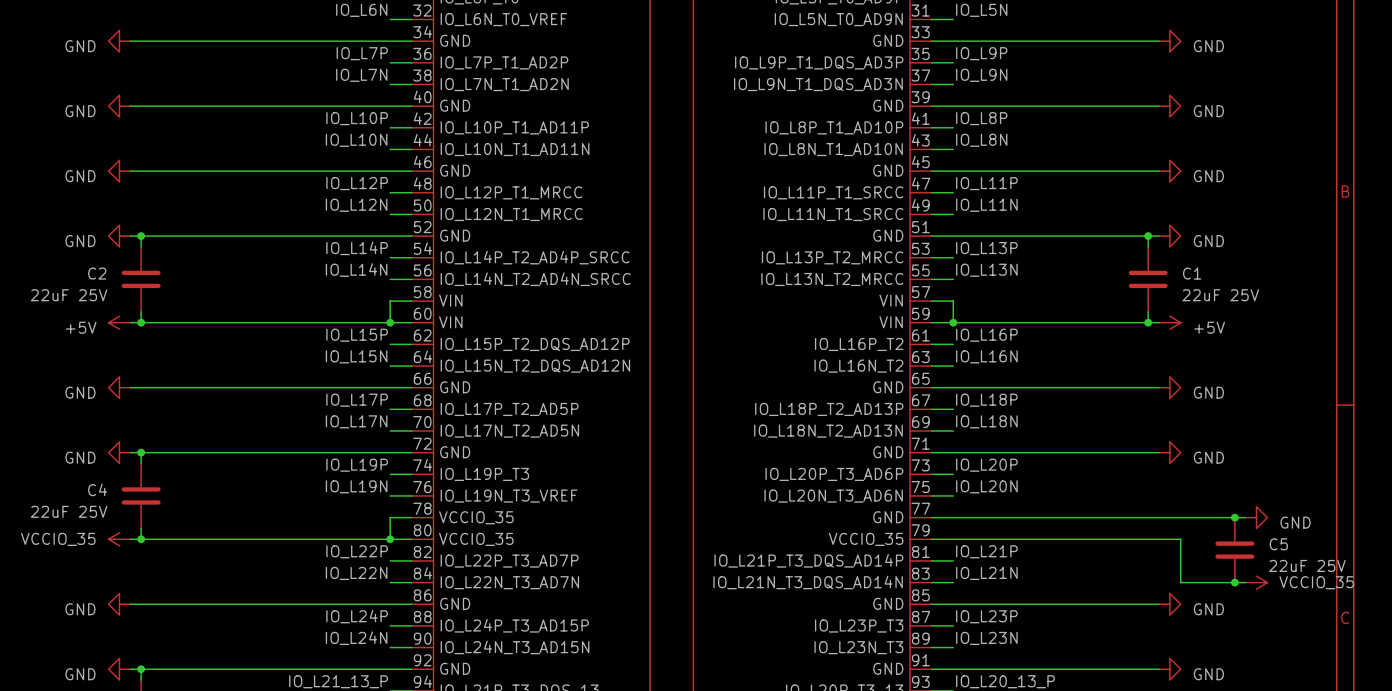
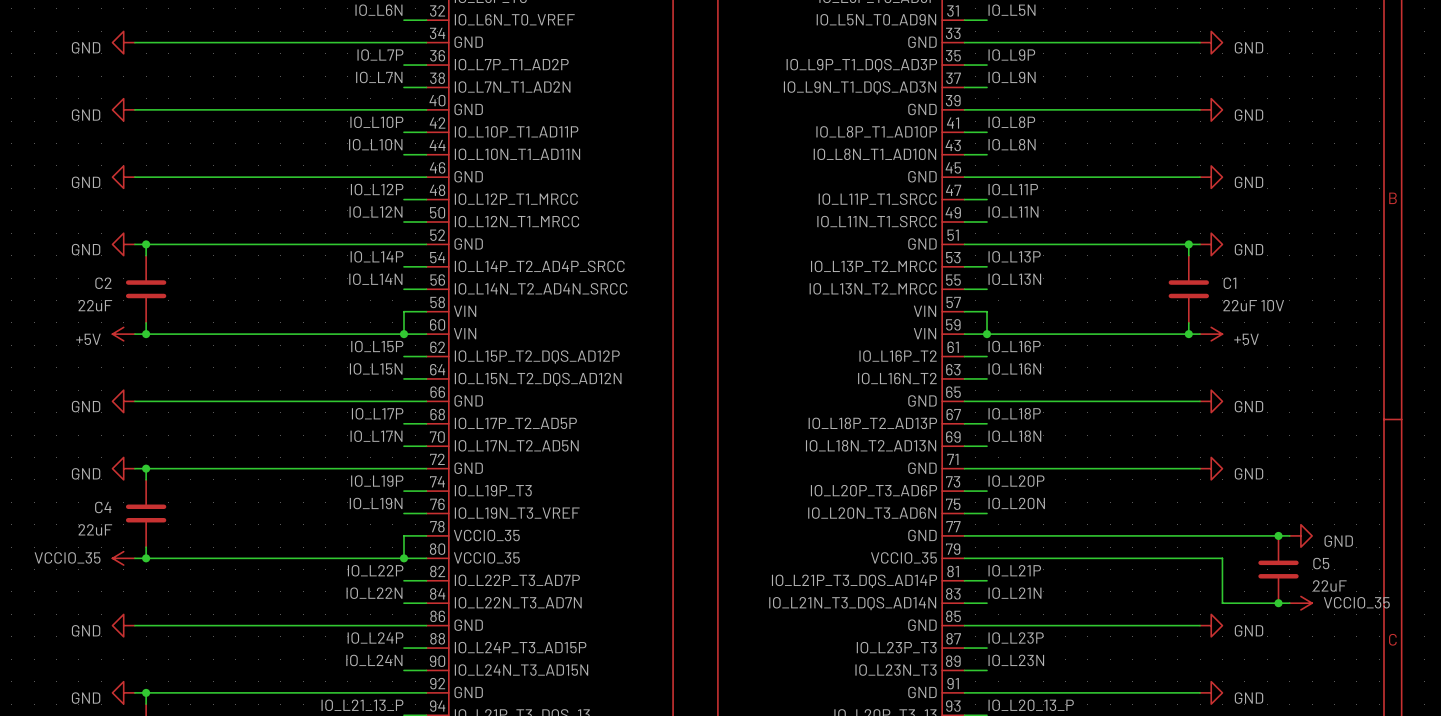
C2 value: 22uF 25V (69, 295) -> 22uF (95, 305)
C1 value: 22uF 25V (1220, 295) -> 22uF 10V (1253, 305)
C4 value: 22uF 25V (69, 511) -> 22uF (95, 529)
C5 value: 22uF 25V (1307, 565) -> 22uF (1329, 585)

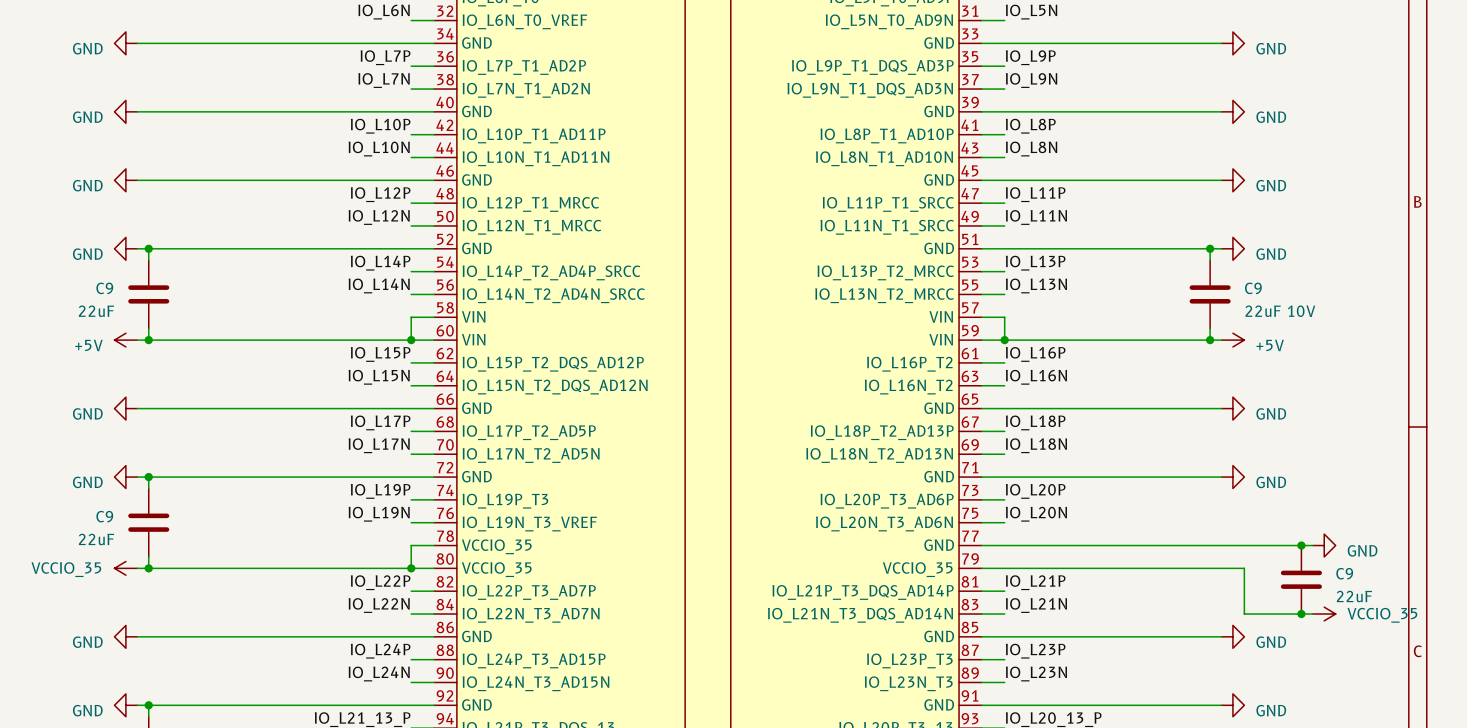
C2 name: C2 (103, 283) -> C9 (104, 288)
C1 name: C1 (1229, 283) -> C9 (1253, 288)
C4 name: C4 (103, 507) -> C9 (104, 516)
C5 name: C5 (1321, 563) -> C9 (1344, 573)

